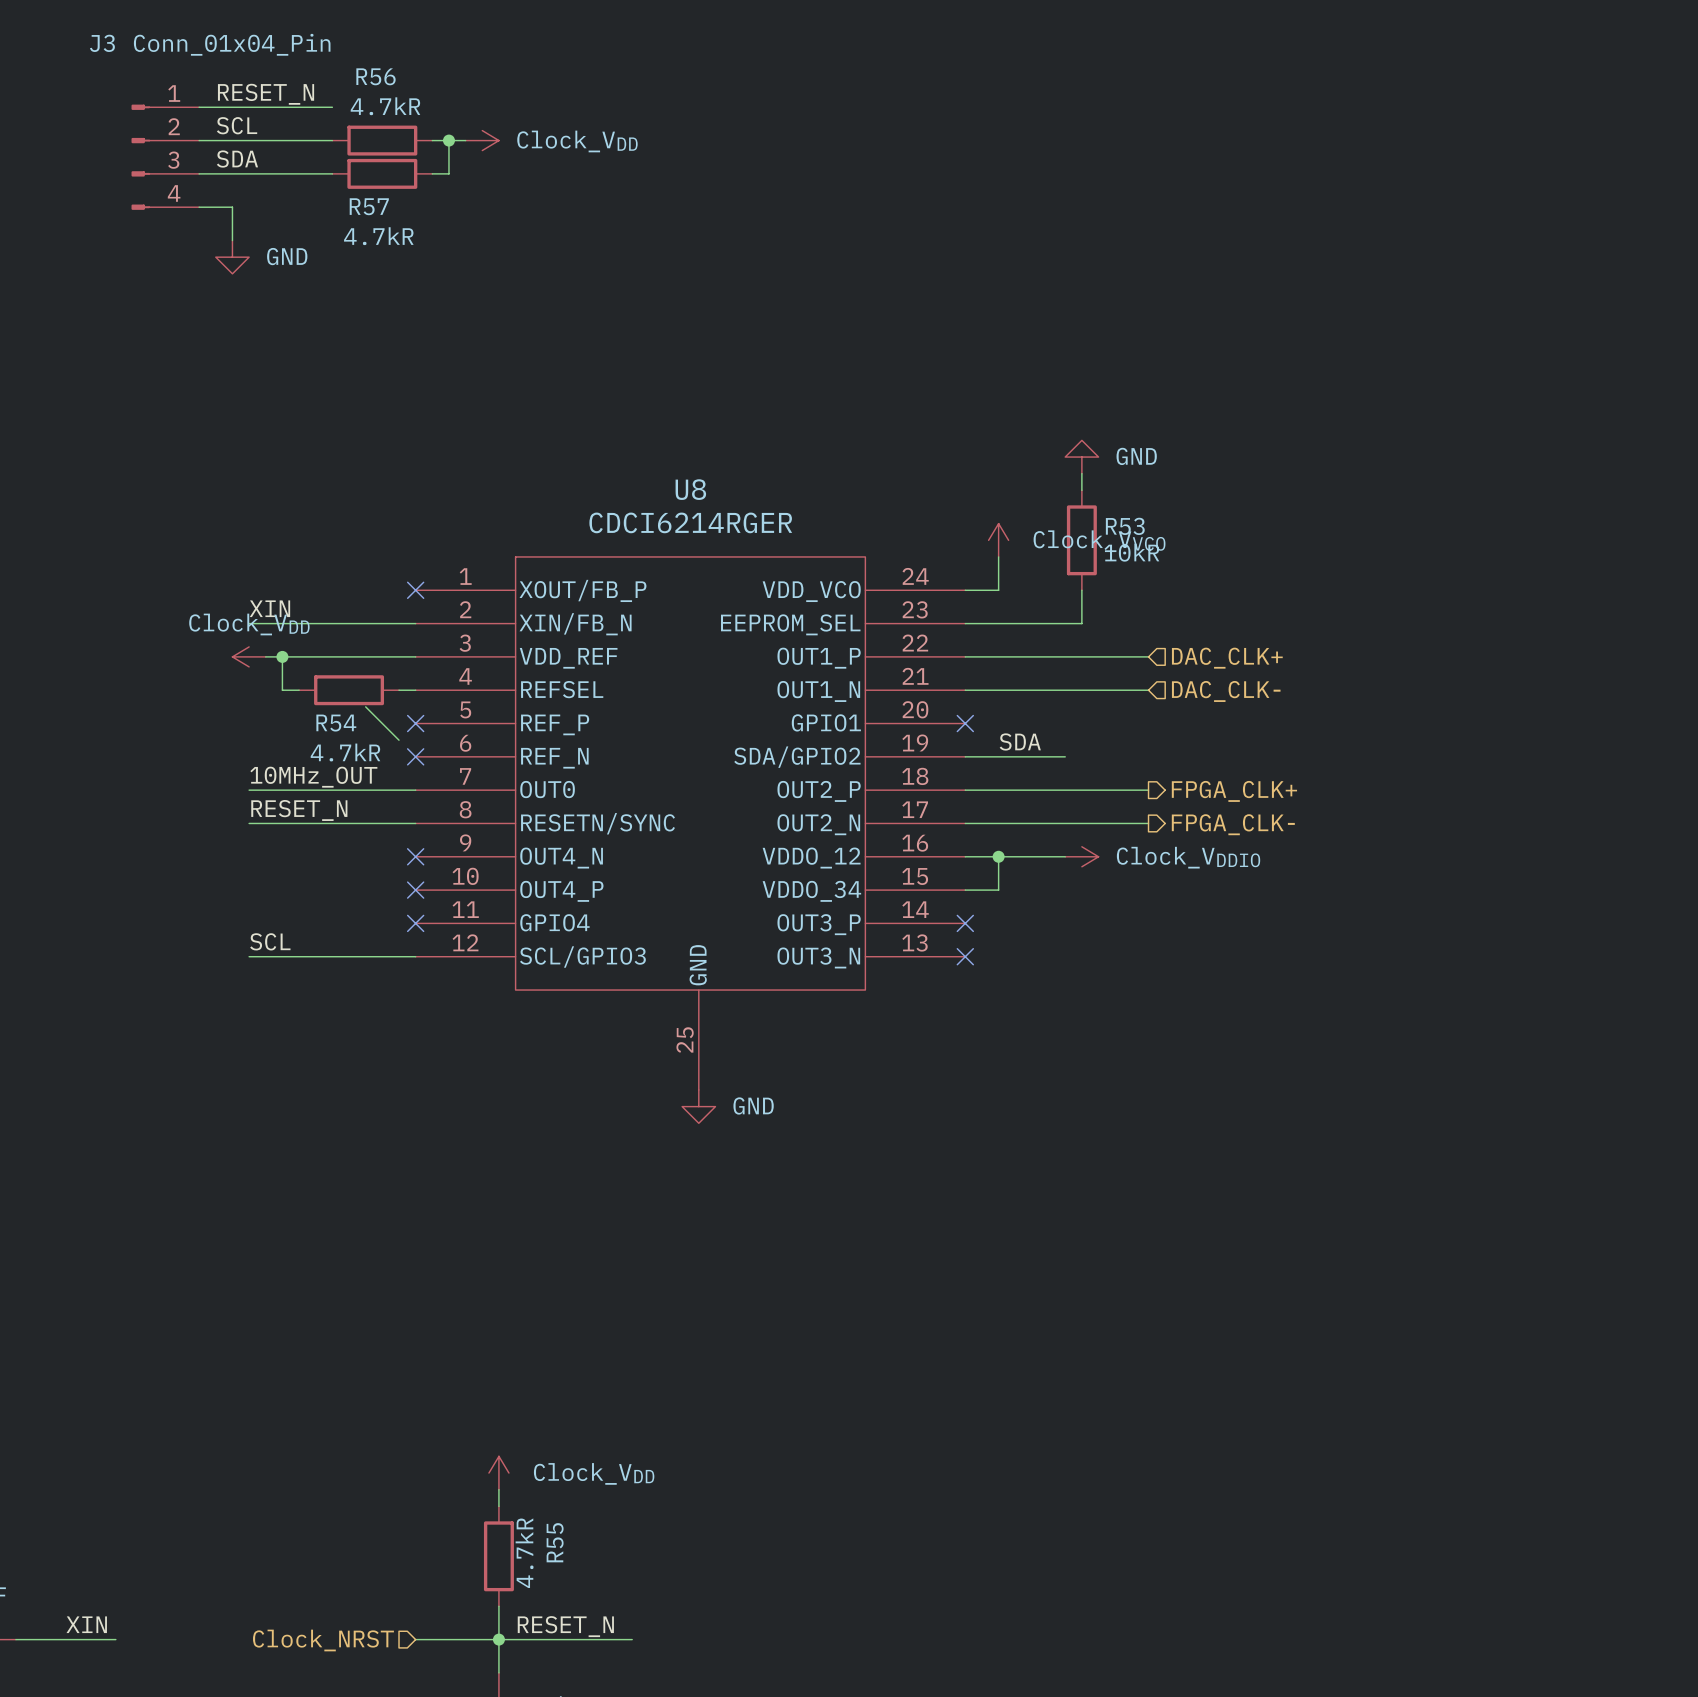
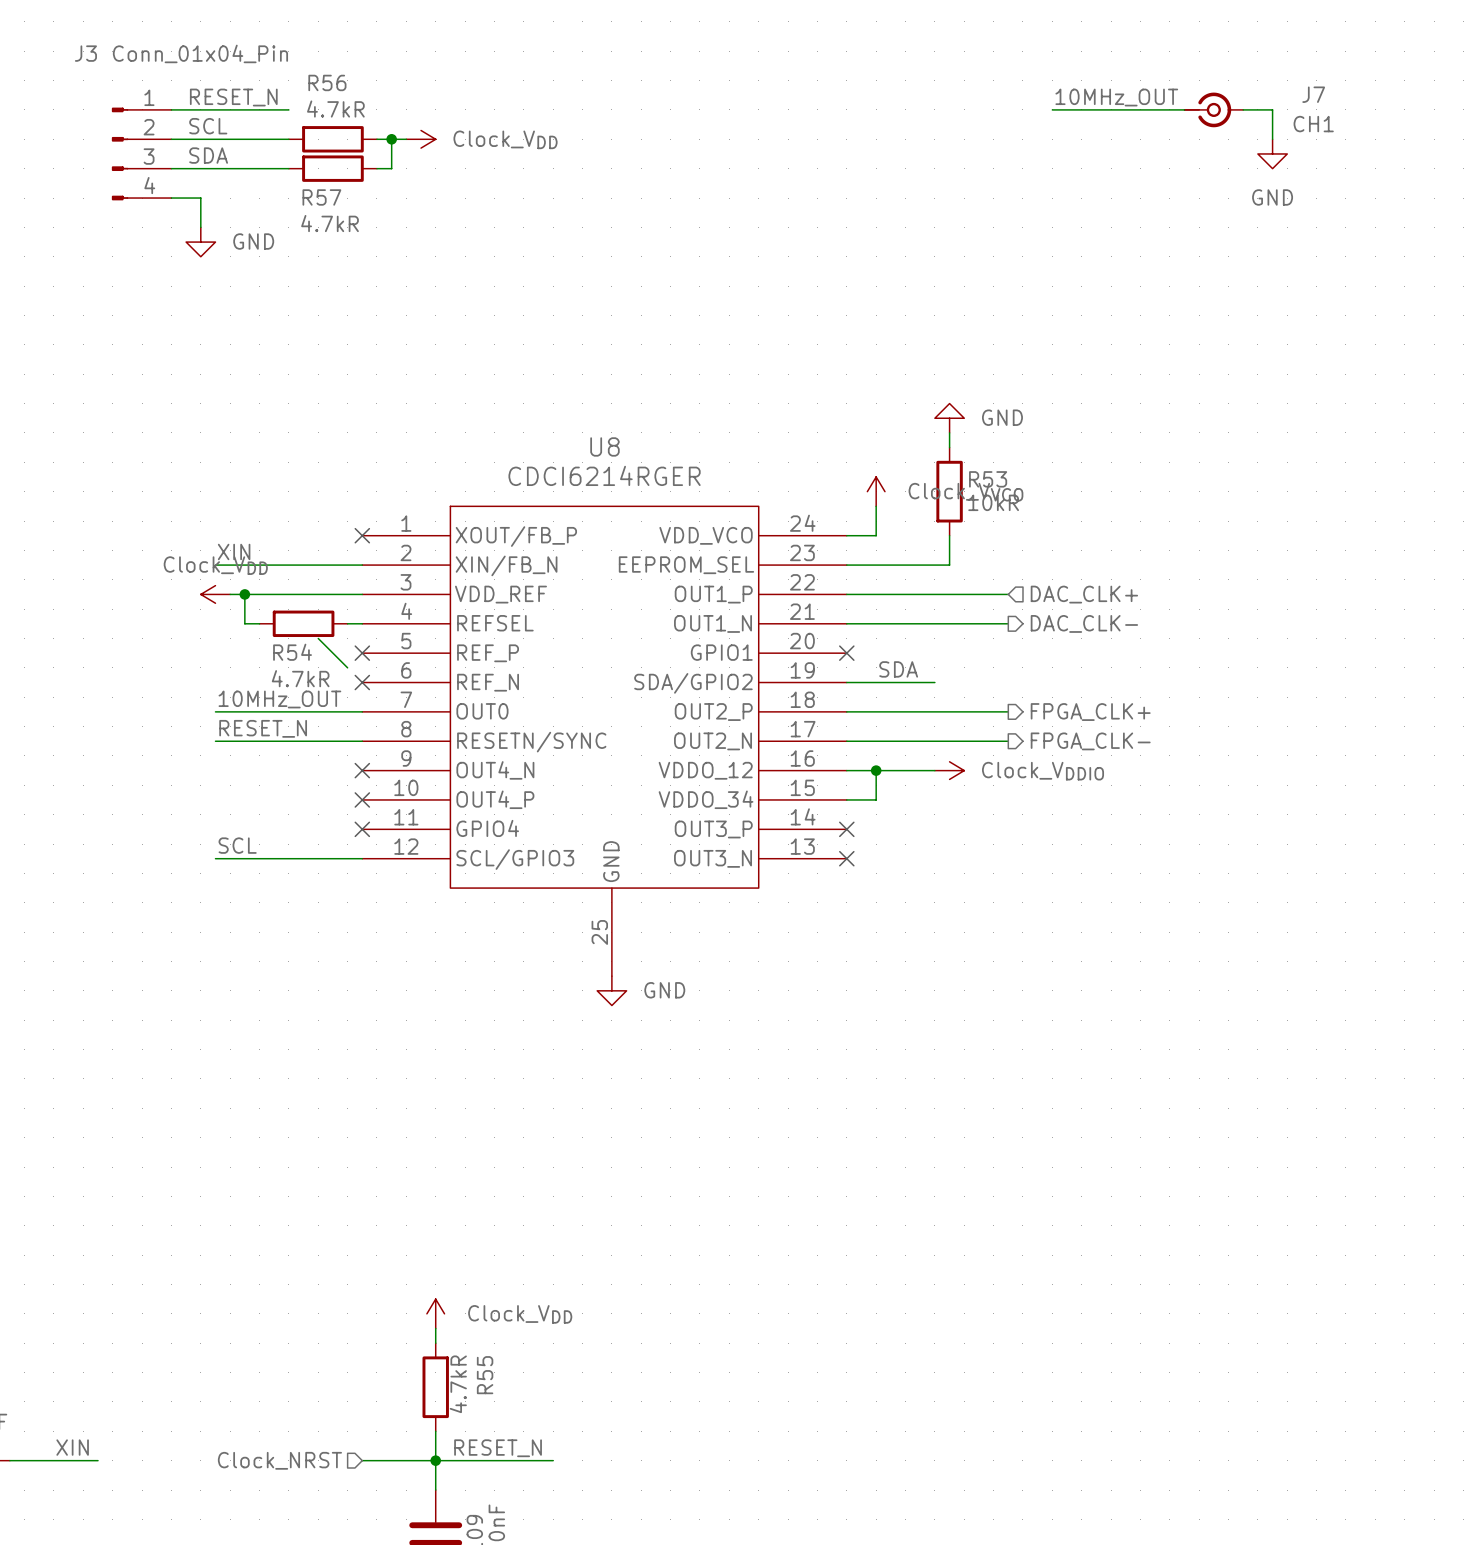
label: none -> 10MHz_OUT (1116, 97)
wire: none -> (1052, 109) (1184, 109)
J7: none -> CH1 (1213, 109)
wire: none -> (1243, 109) (1272, 109) (1272, 139)
power symbol: none -> GND (1272, 153)
hierarchical label shape: input (1226, 691) -> output (1084, 623)

